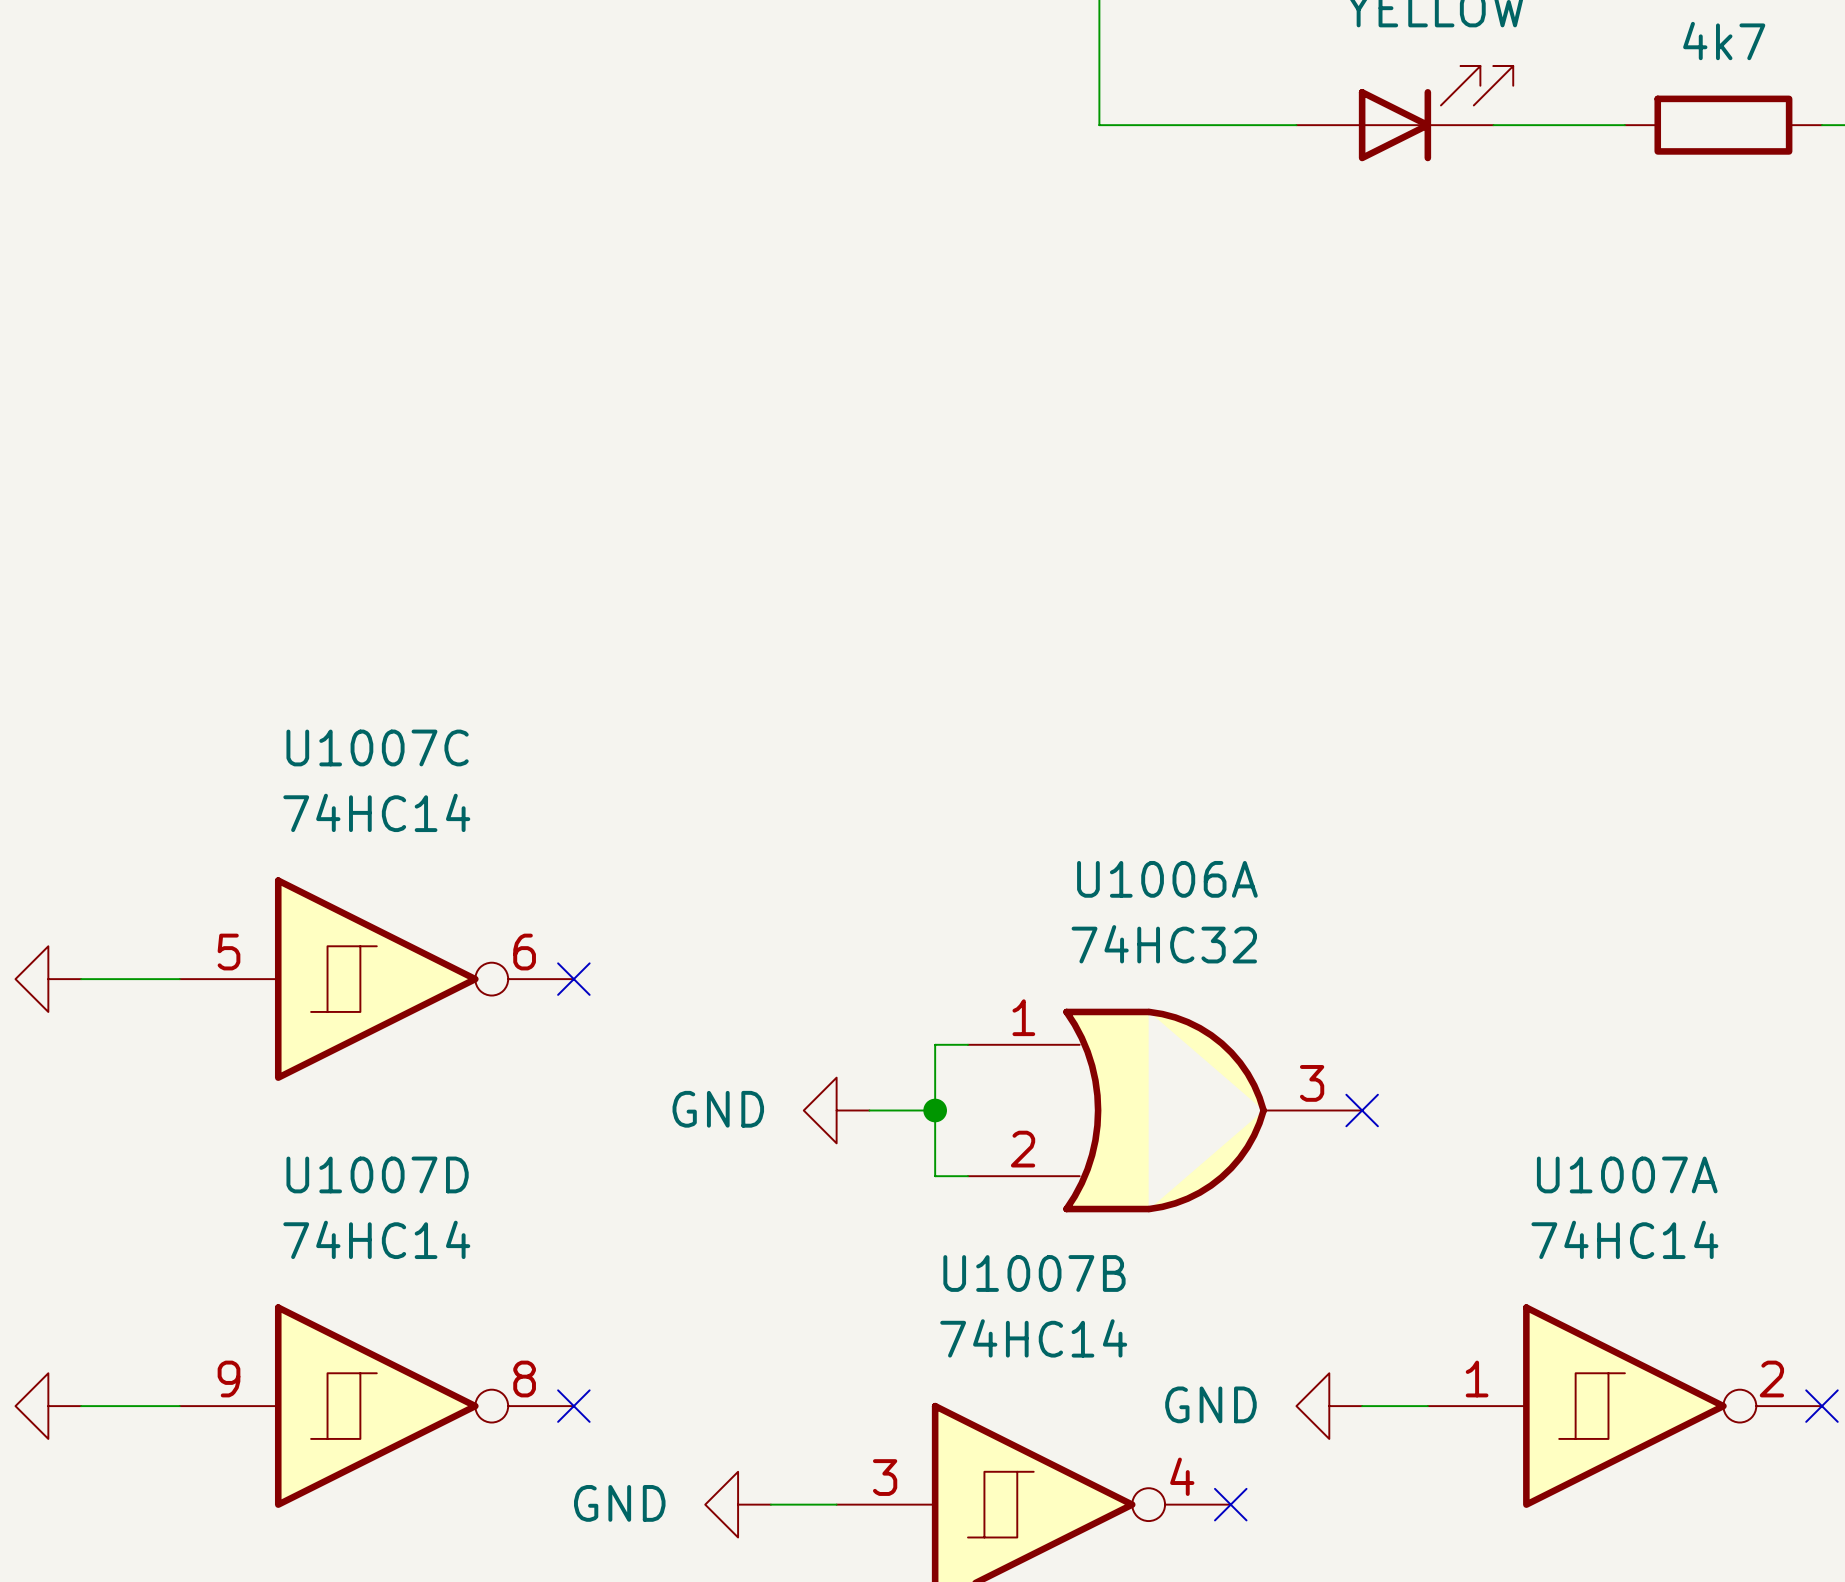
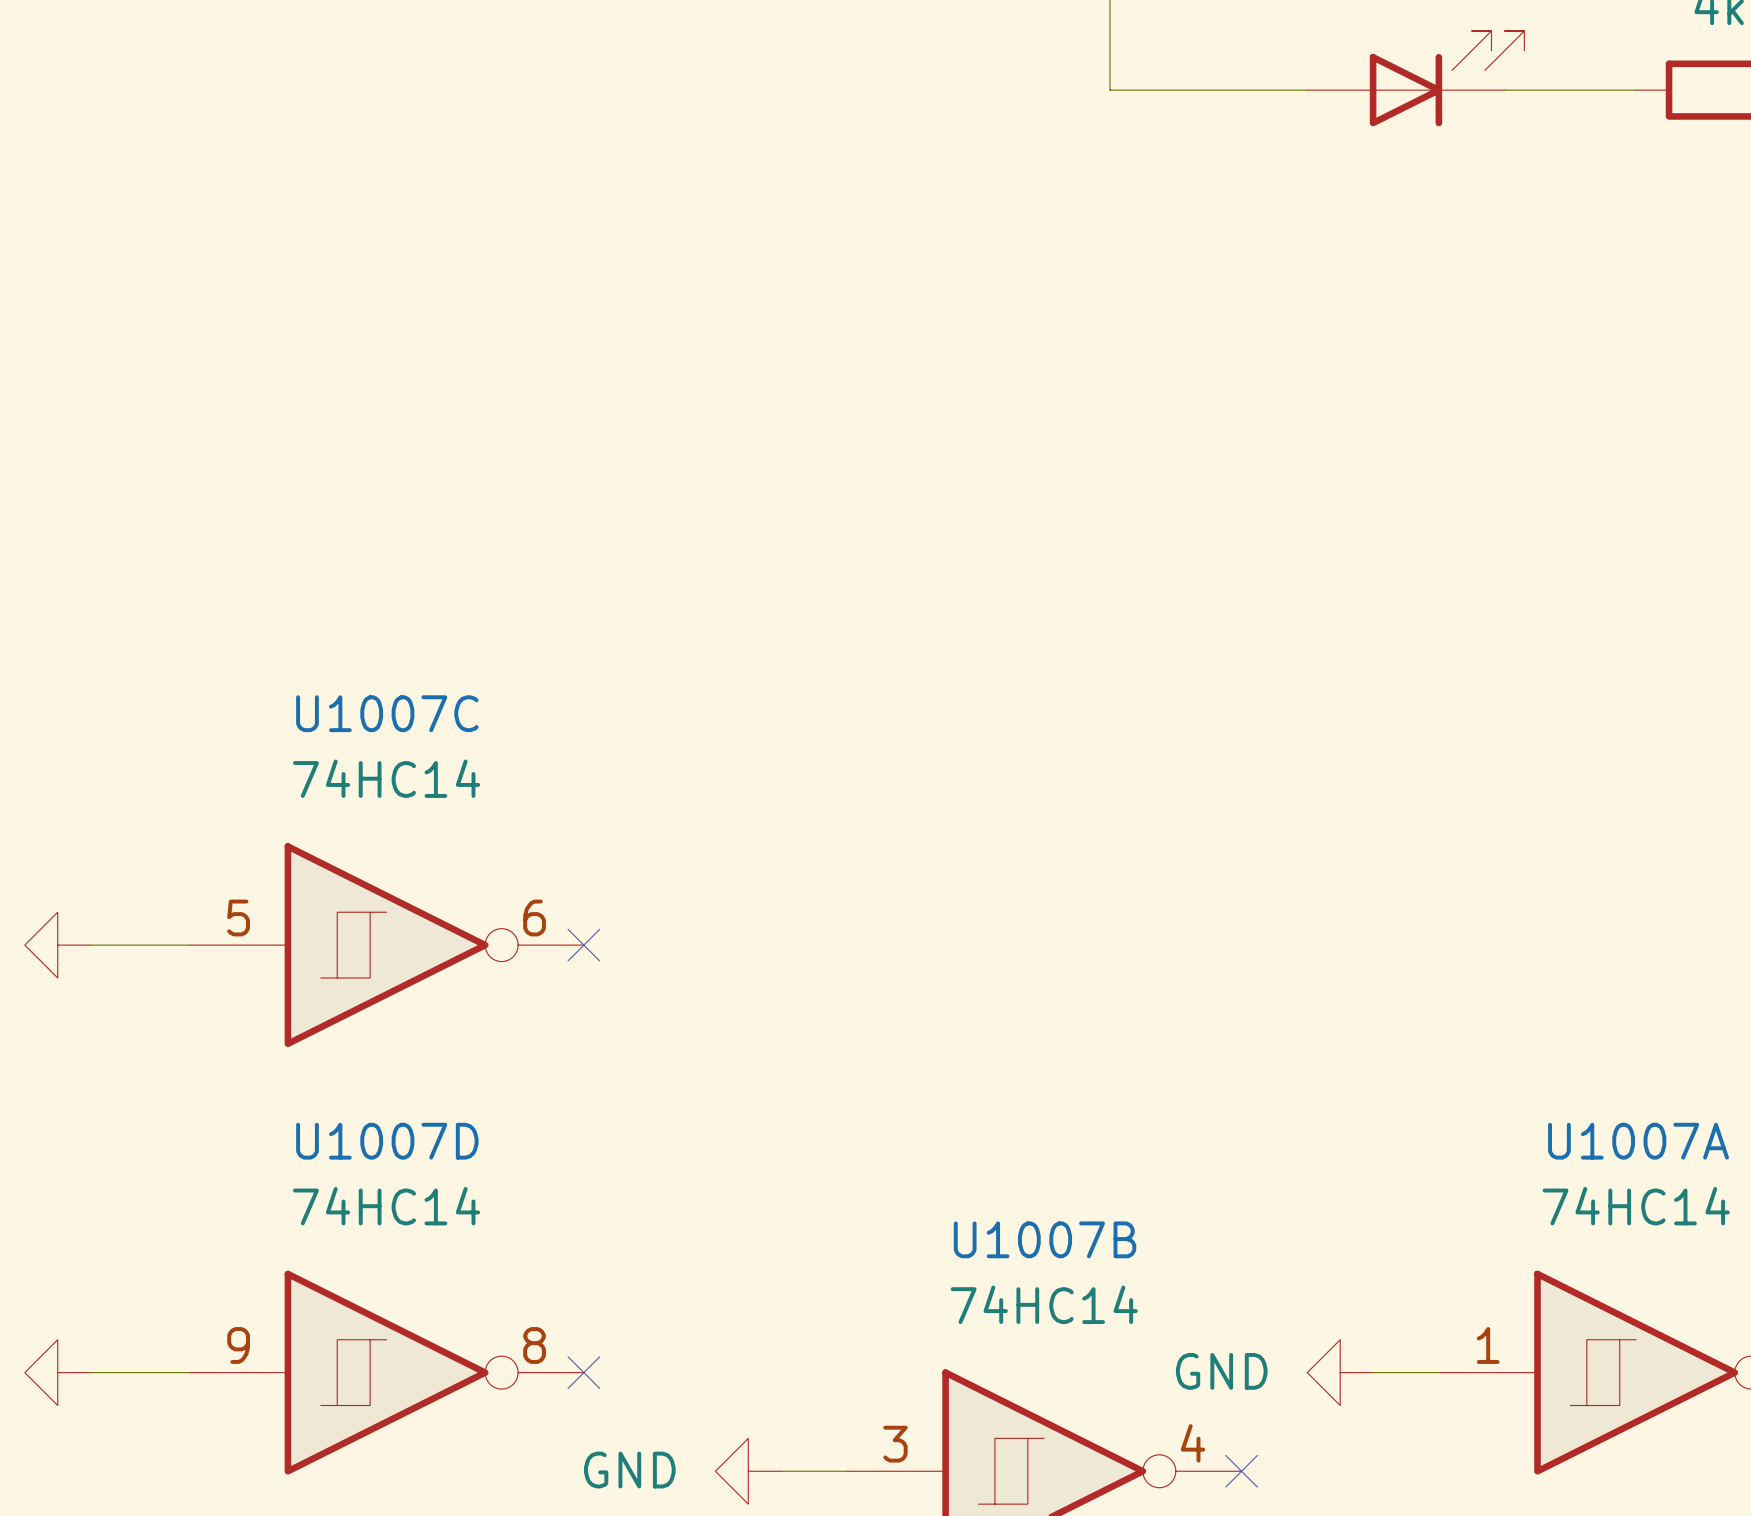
wire: (968, 1044) (935, 1044) (935, 1176) (968, 1176) -> none
power symbol: GND (836, 1110) -> none
wire: (869, 1110) (935, 1110) -> none
junction: (935, 1110) -> none
U1006A: 74HC32 (1165, 1110) -> none
no-connect mark: (1362, 1110) -> none

